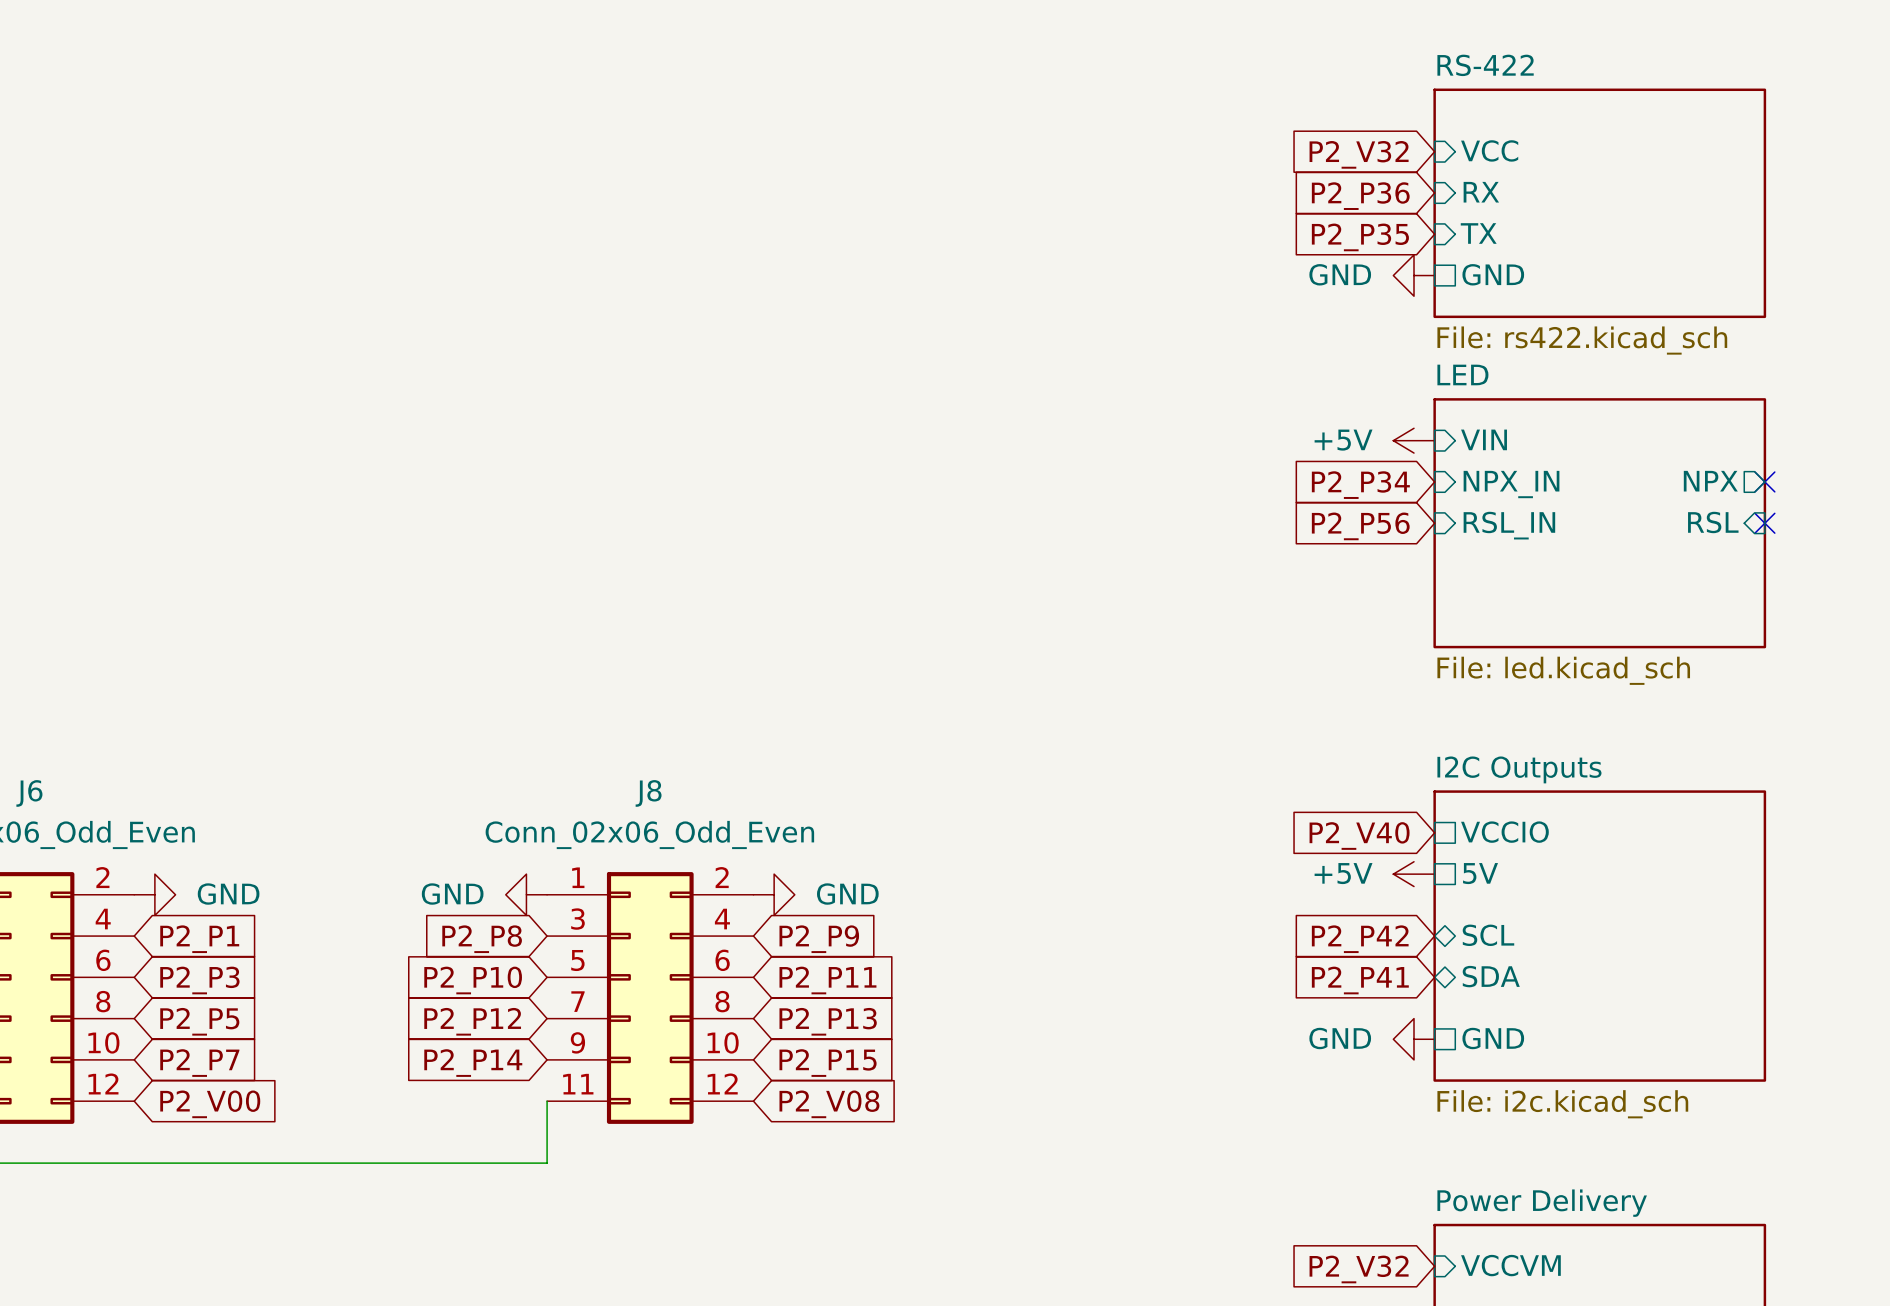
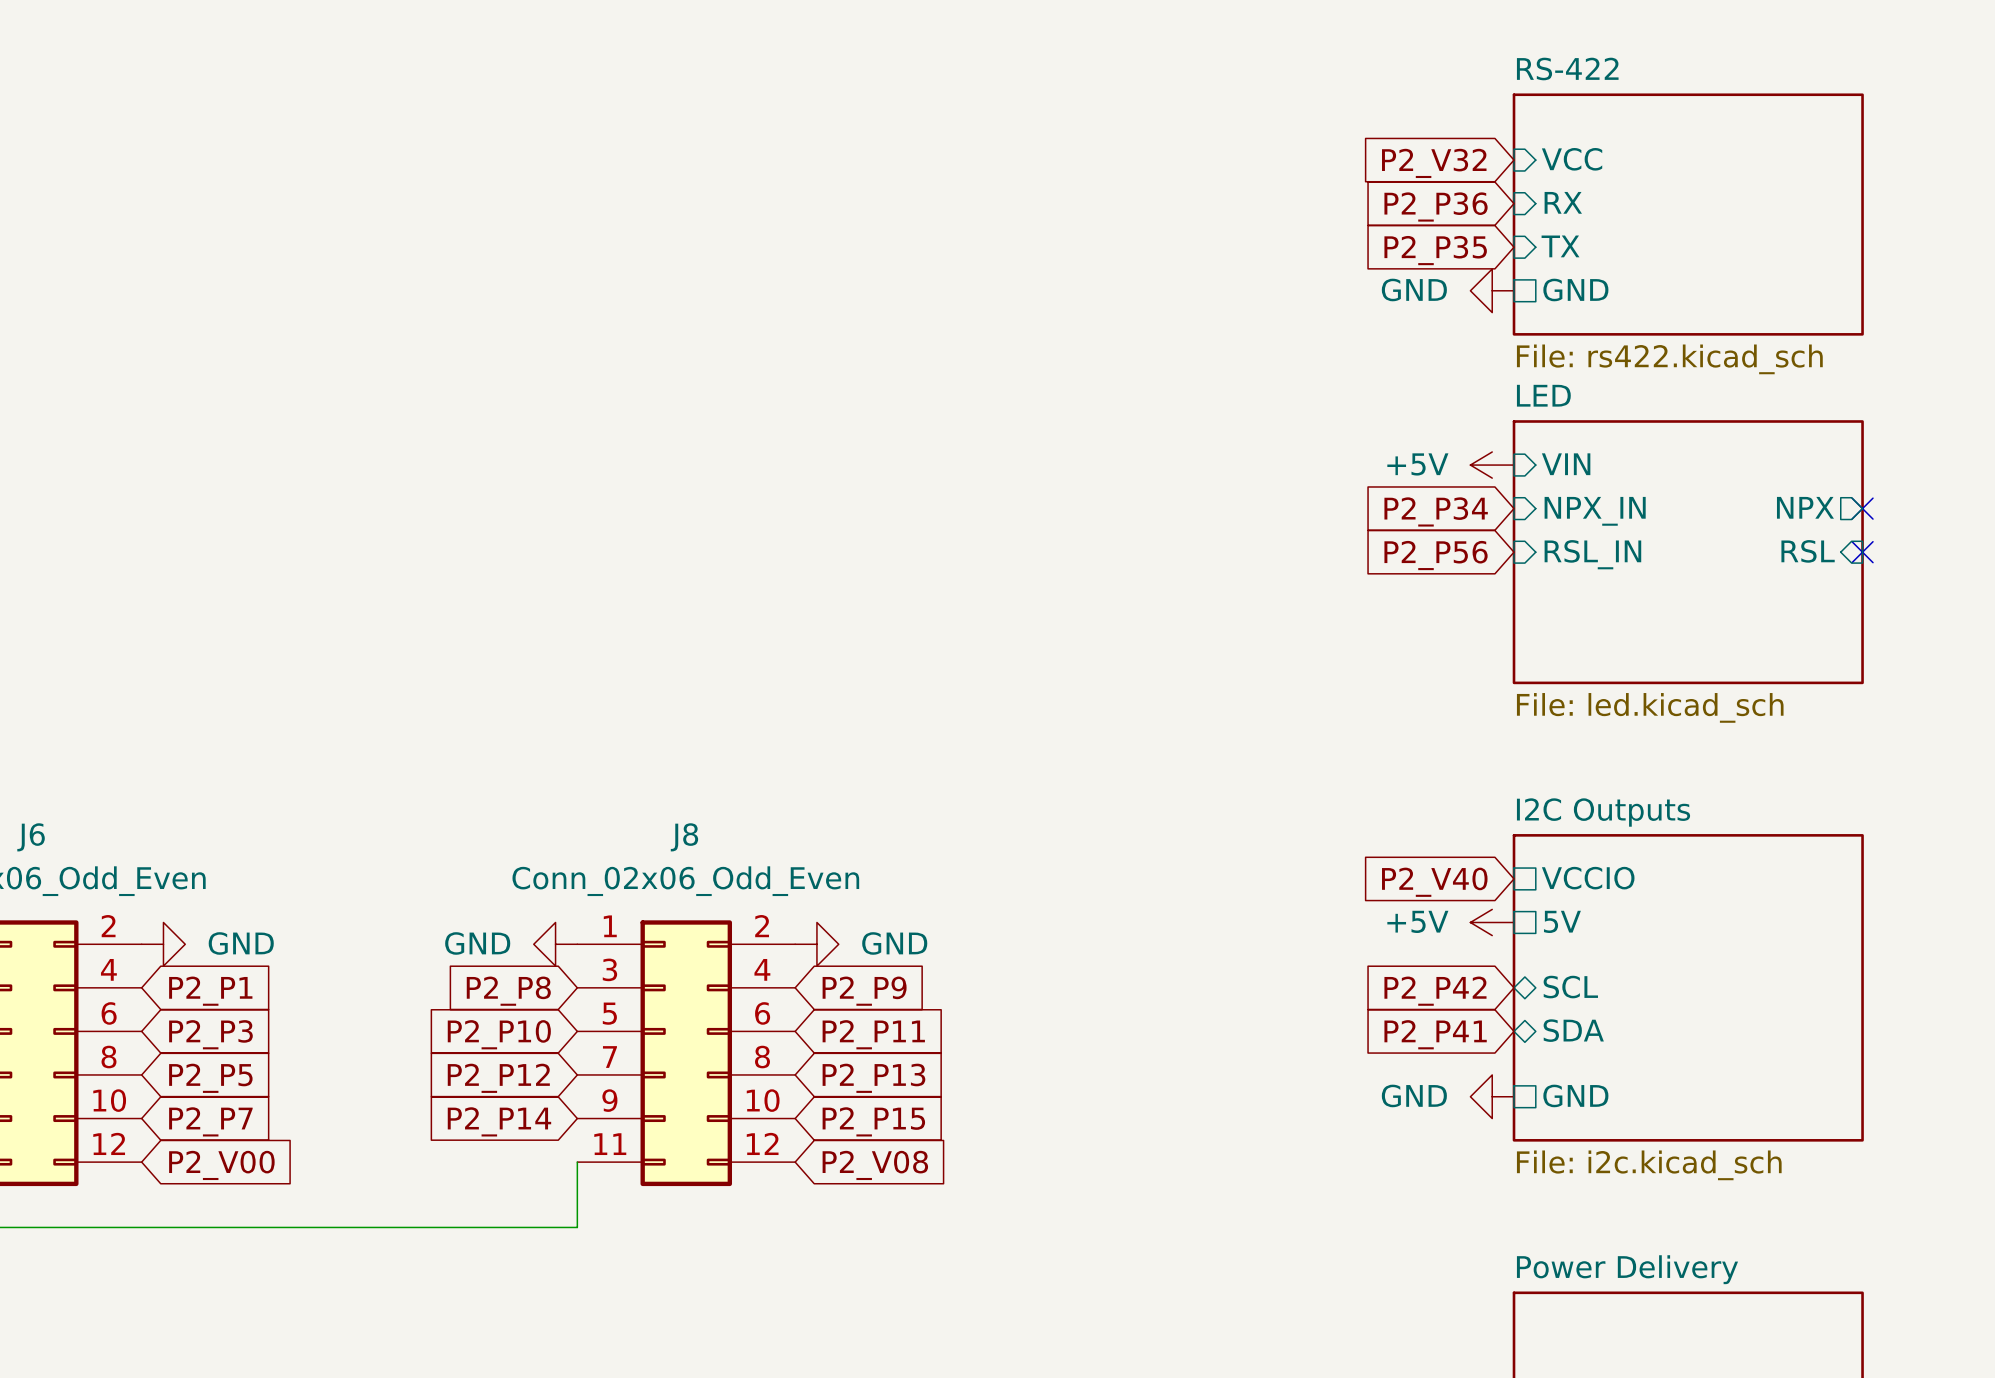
sheet pin: VCCVM (1510, 1265) -> none
global label: P2_V32 (1359, 1269) -> none

